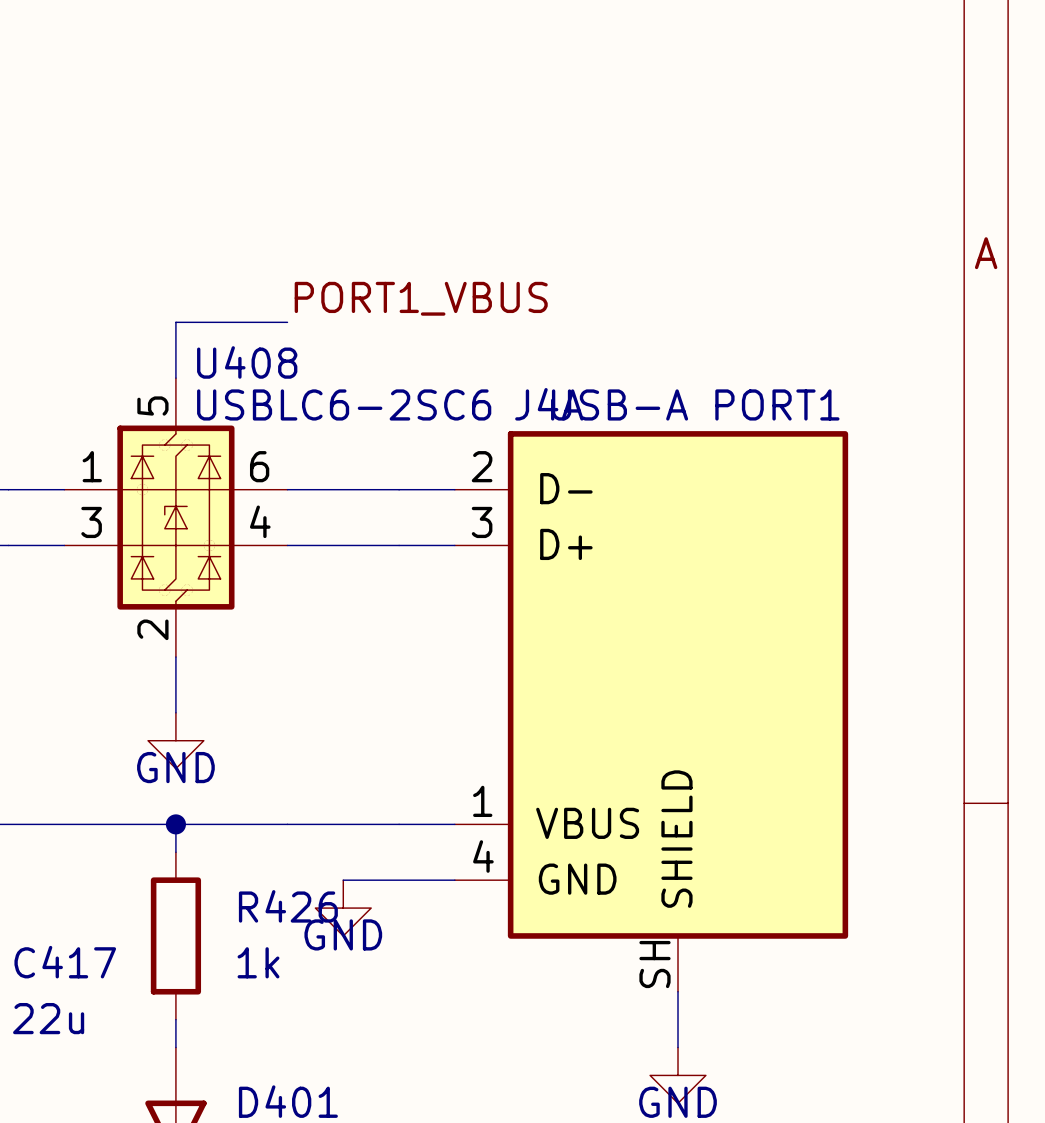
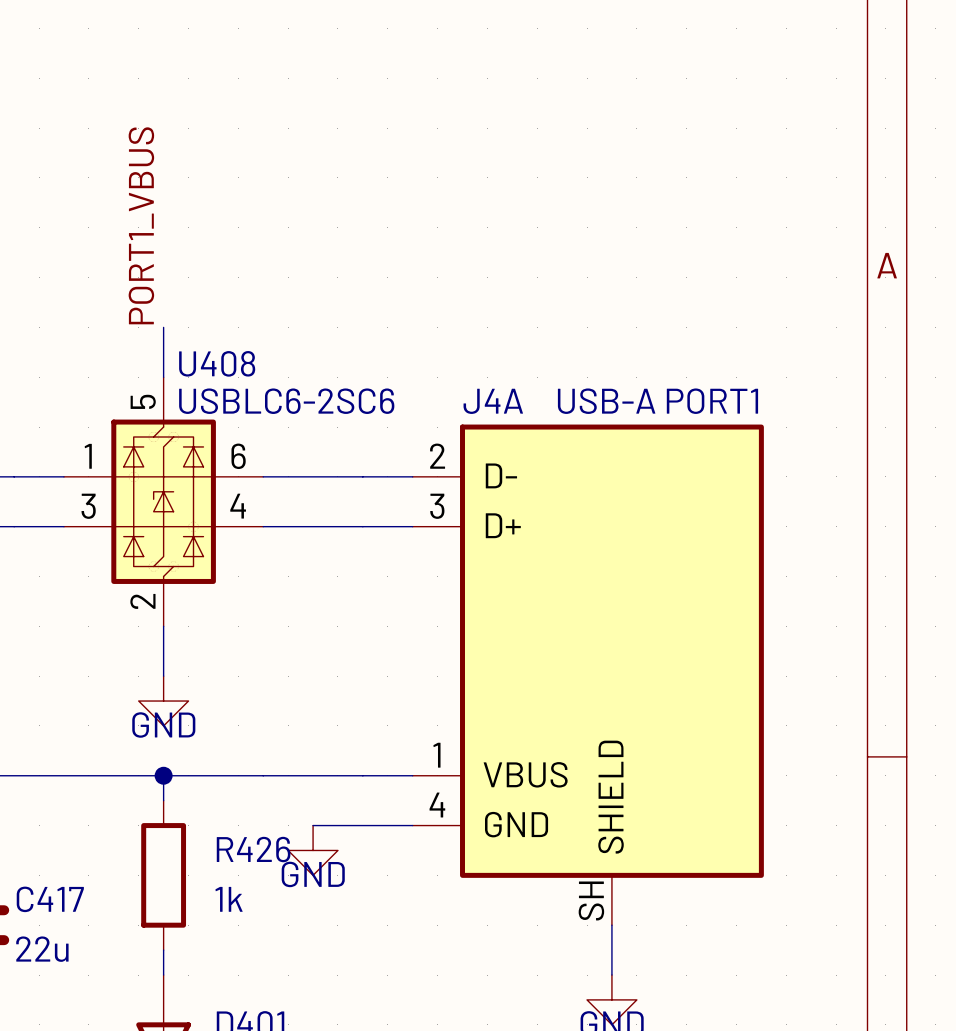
label rotation: 0° (421, 298) -> 90° counterclockwise (141, 225)
label position: PORT1_VBUS (421, 298) -> PORT1_VBUS (141, 225)
wire: (175, 322) (287, 322) -> none

